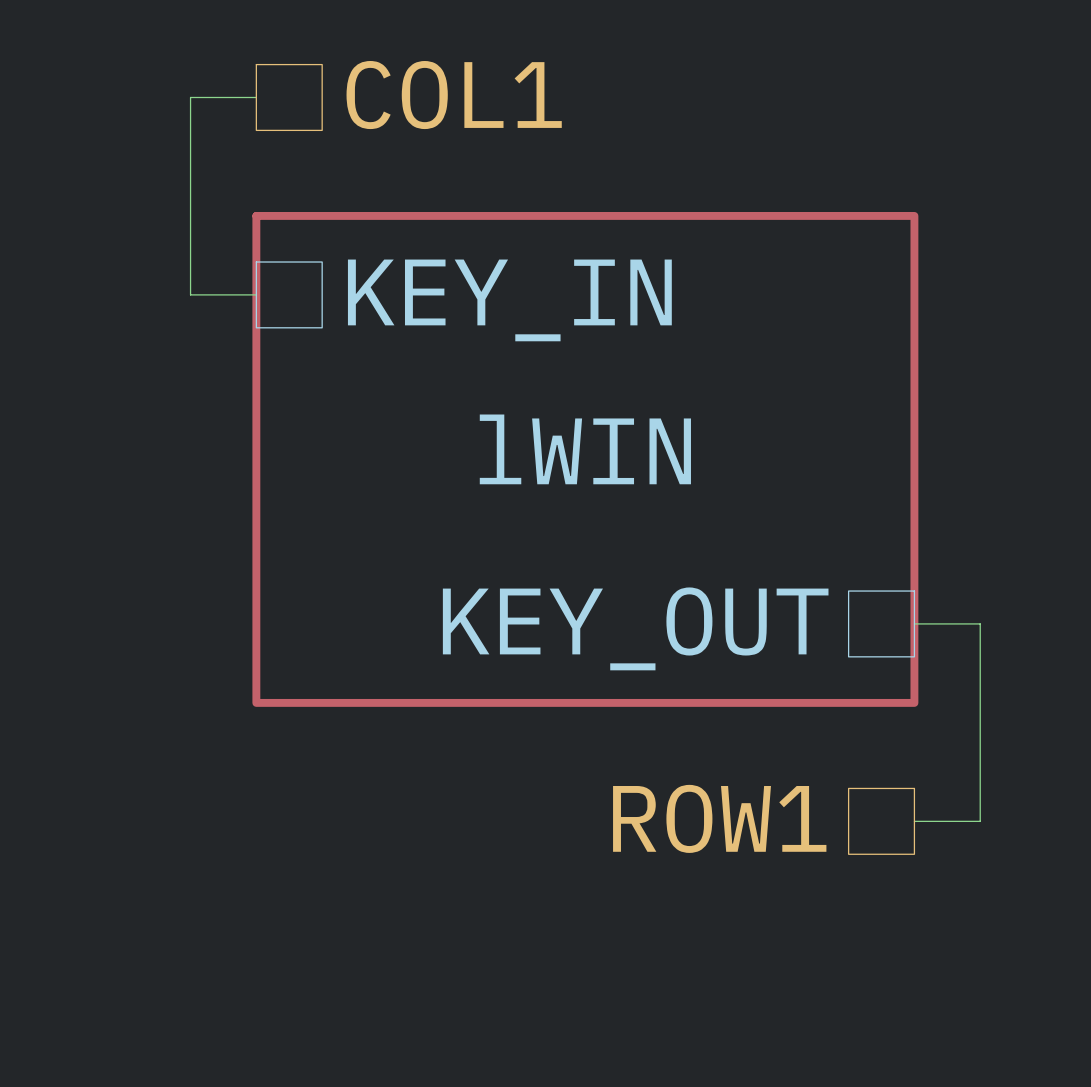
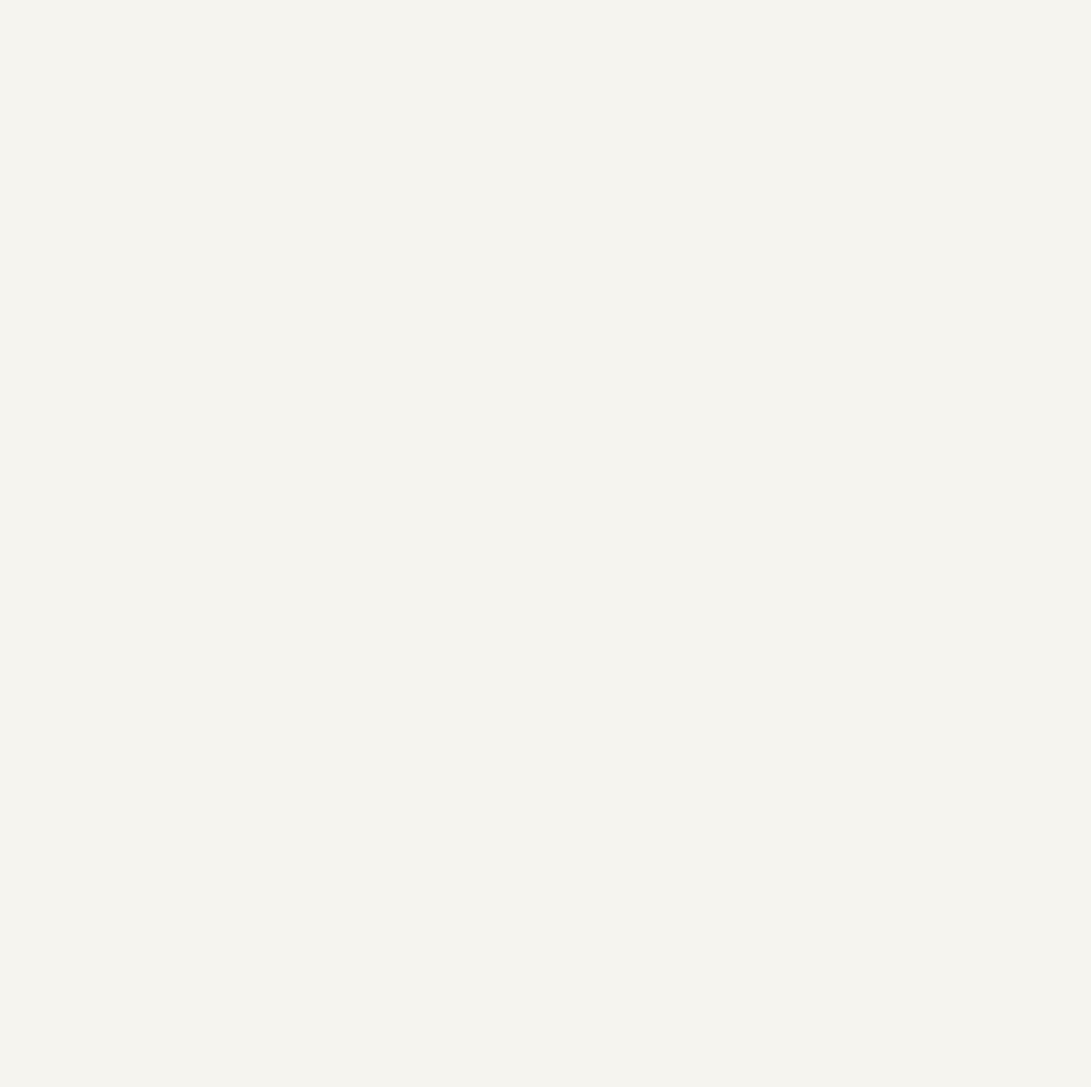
hierarchical label: COL1 (454, 95) -> none
wire: (256, 97) (190, 97) (190, 294) (256, 294) -> none
sheet pin: KEY_IN (509, 300) -> none
sheet lWIN: (585, 459) -> none
wire: (914, 623) (980, 623) (980, 821) (914, 821) -> none
sheet pin: KEY_OUT (635, 628) -> none
hierarchical label: ROW1 (719, 818) -> none

